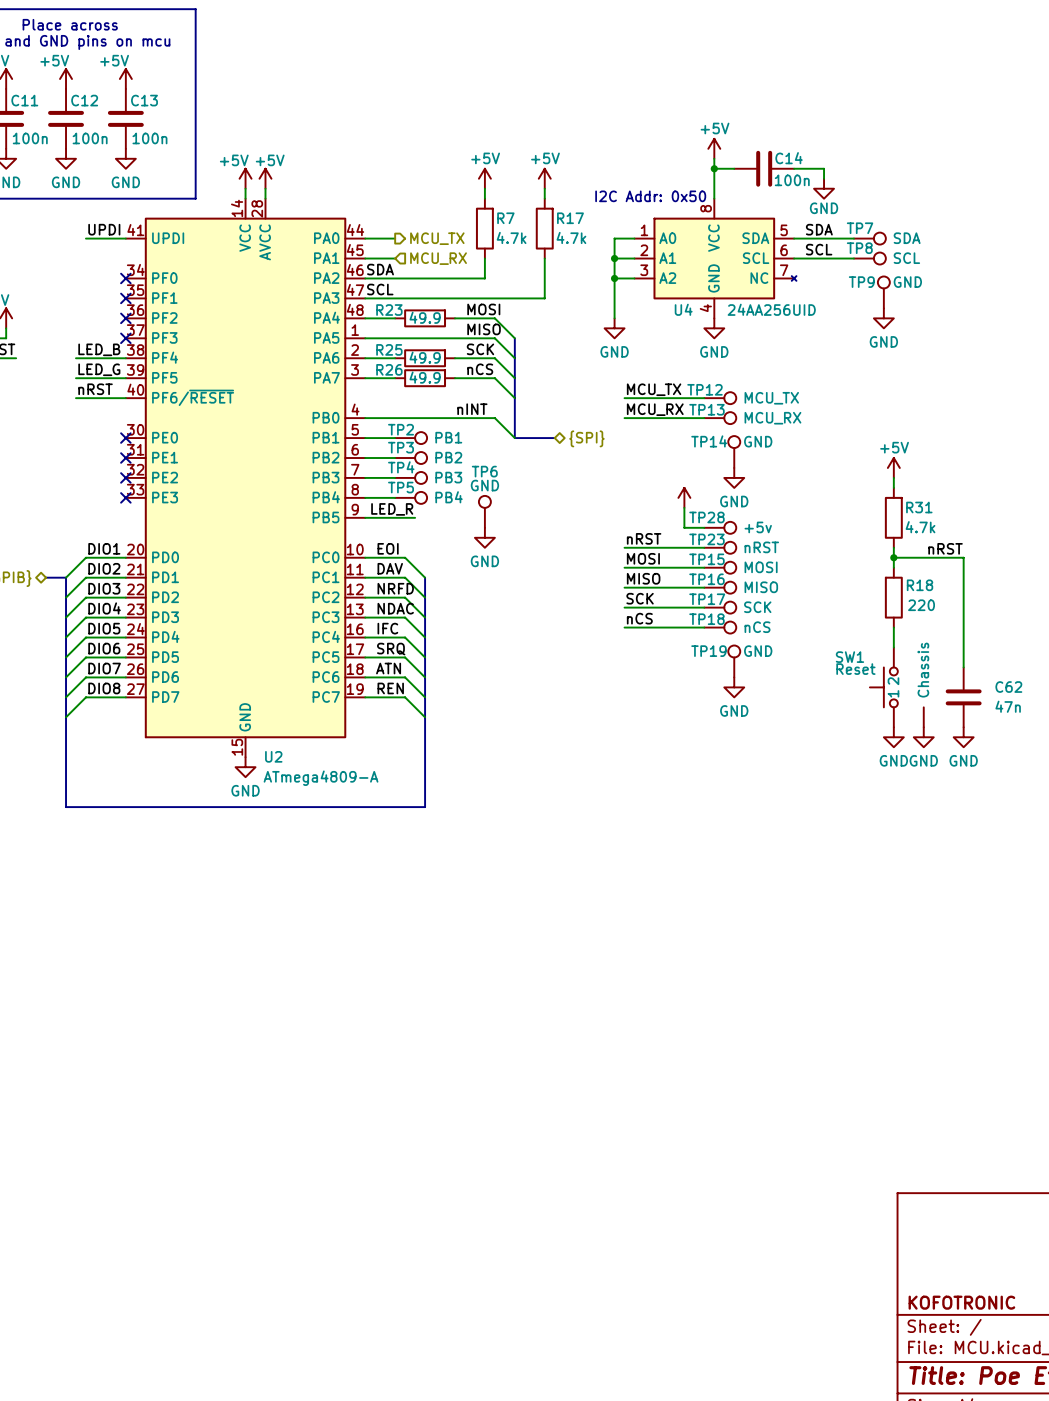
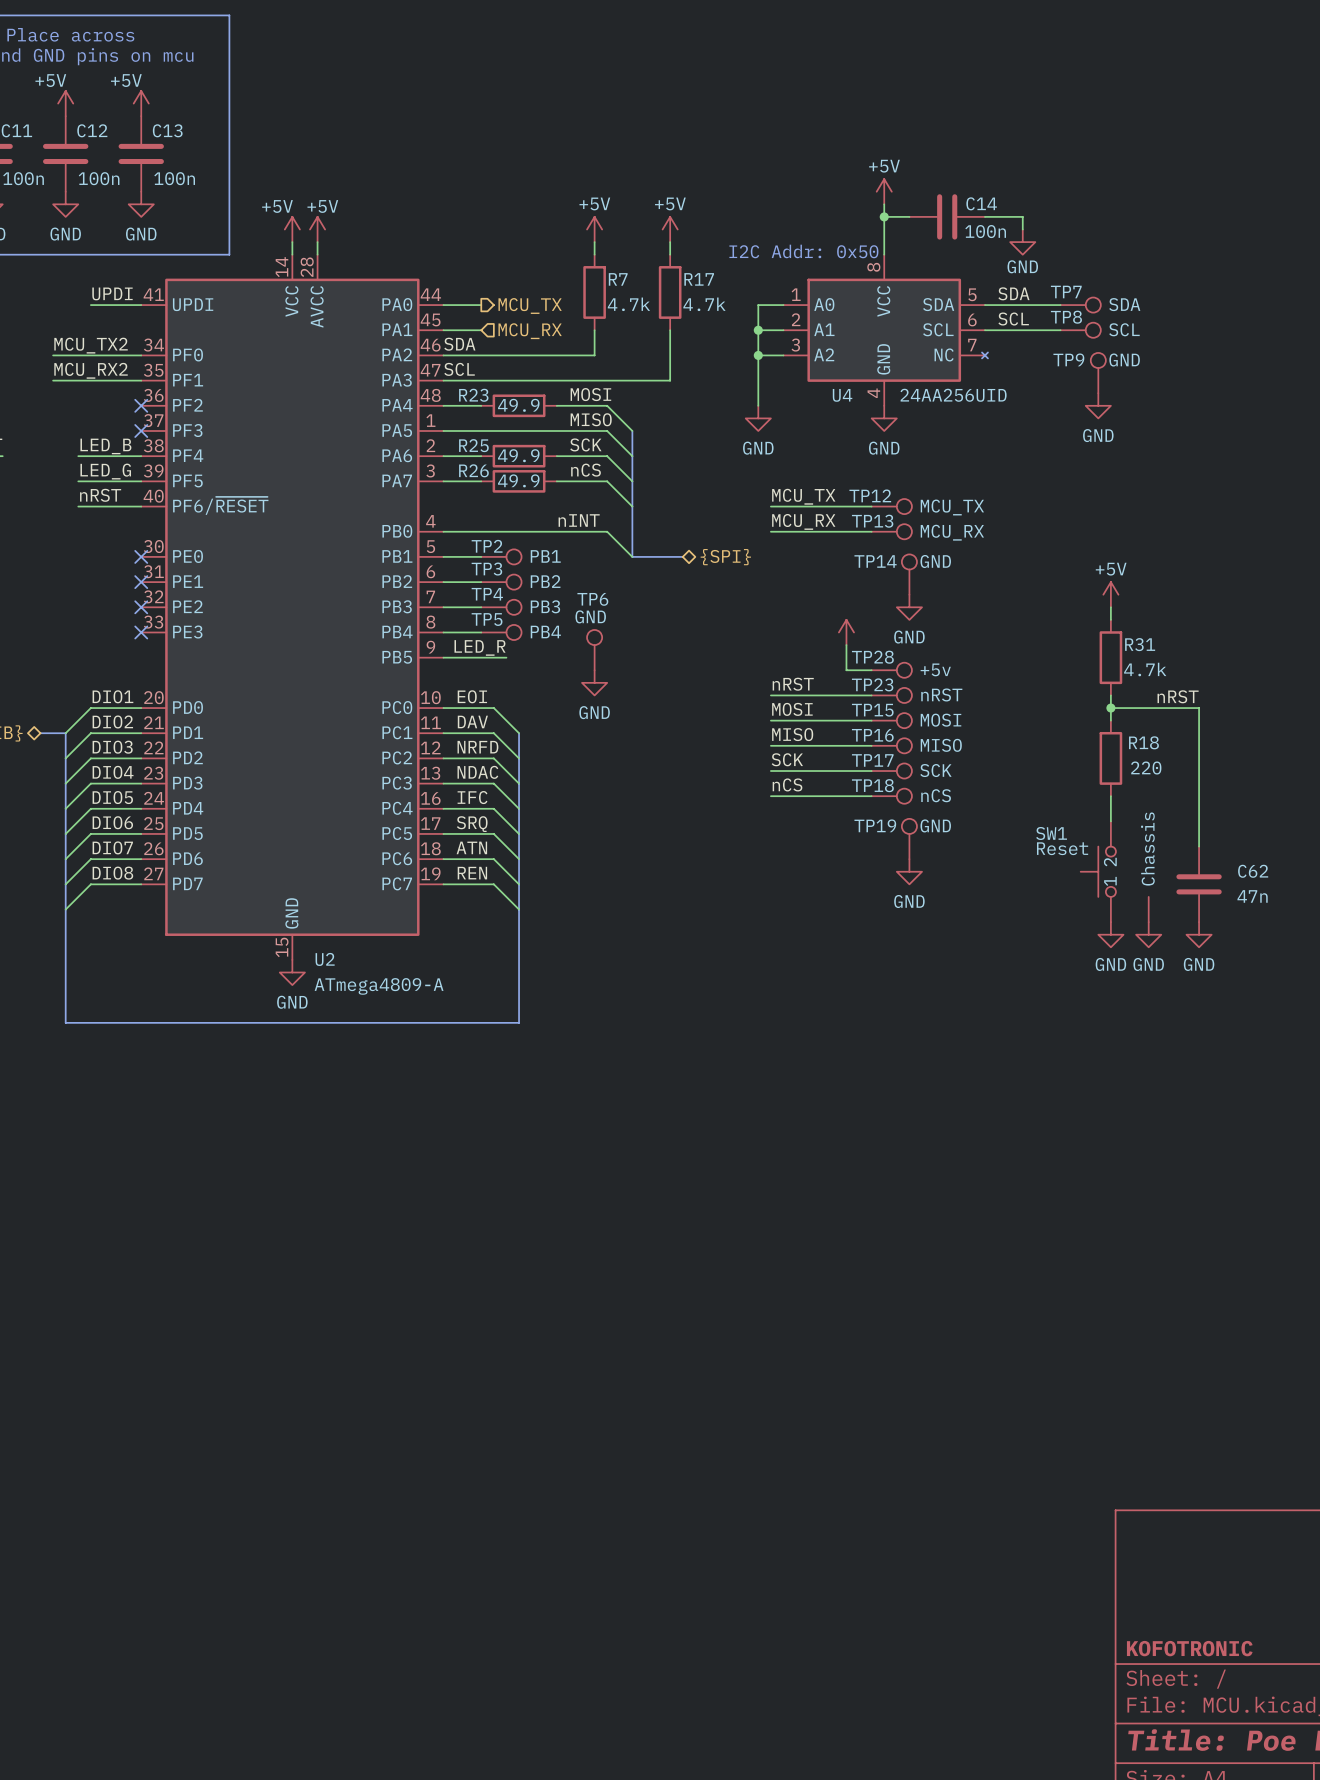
label: none -> MCU_TX2 (91, 345)
wire: none -> (53, 355) (141, 355)
no-connect mark: (125, 278) -> none
label: none -> MCU_RX2 (91, 370)
wire: none -> (53, 380) (141, 380)
no-connect mark: (125, 298) -> none

